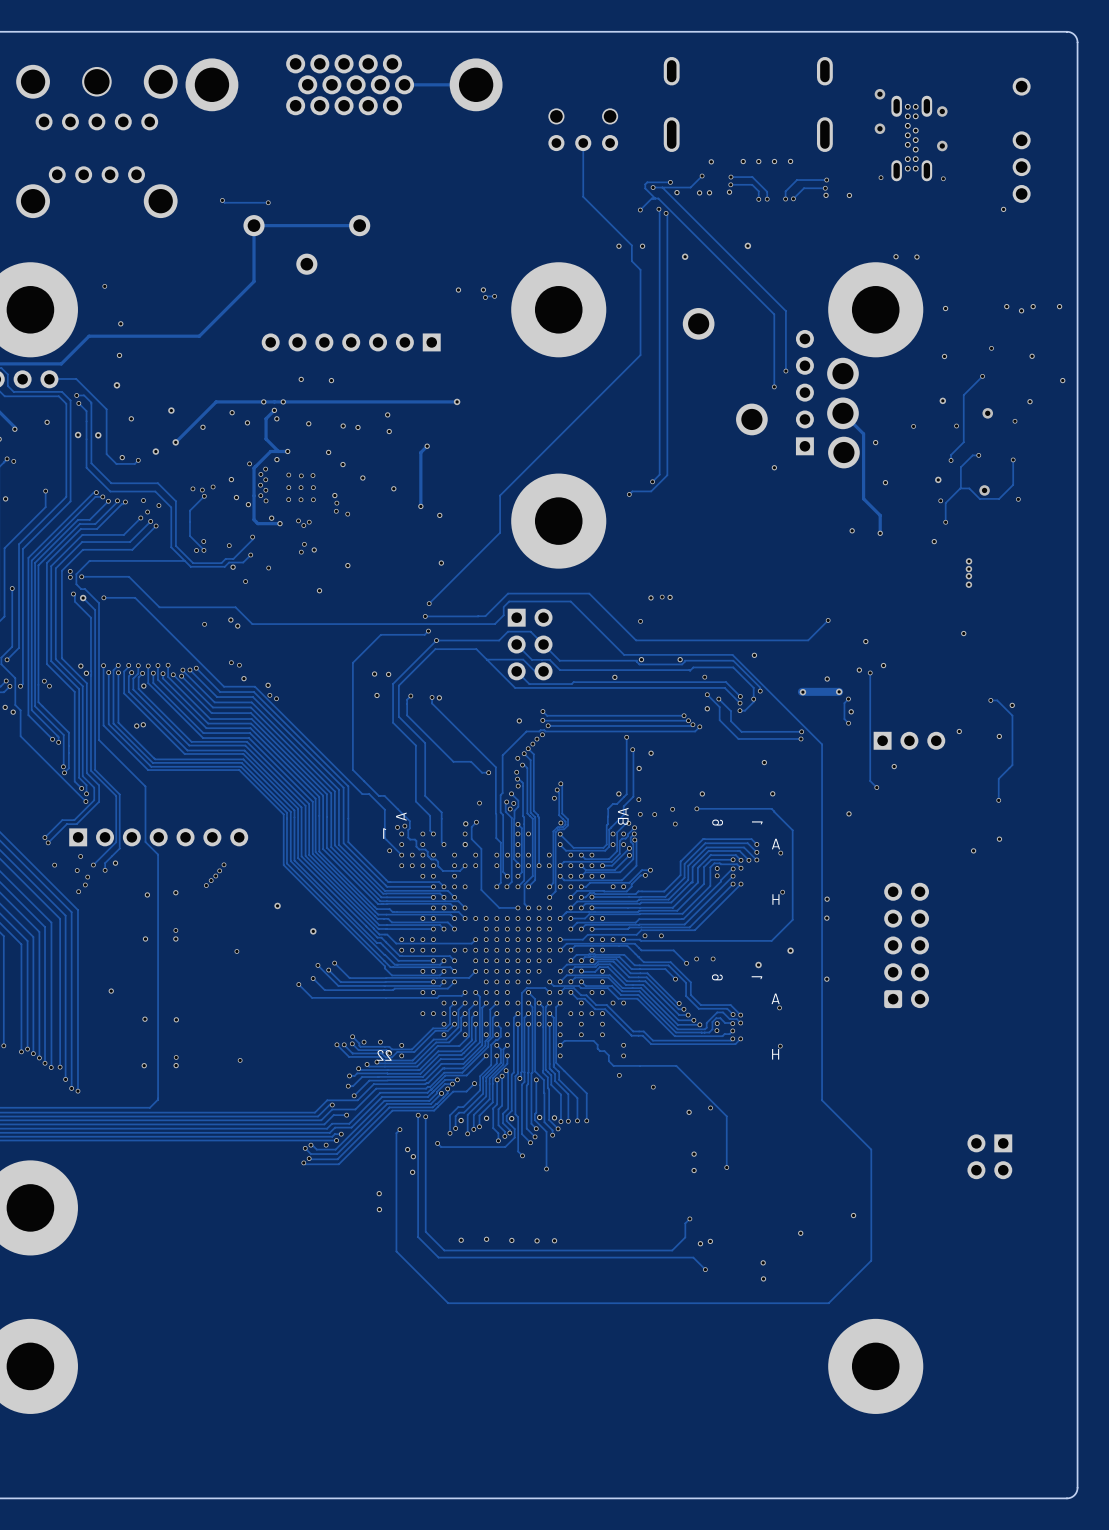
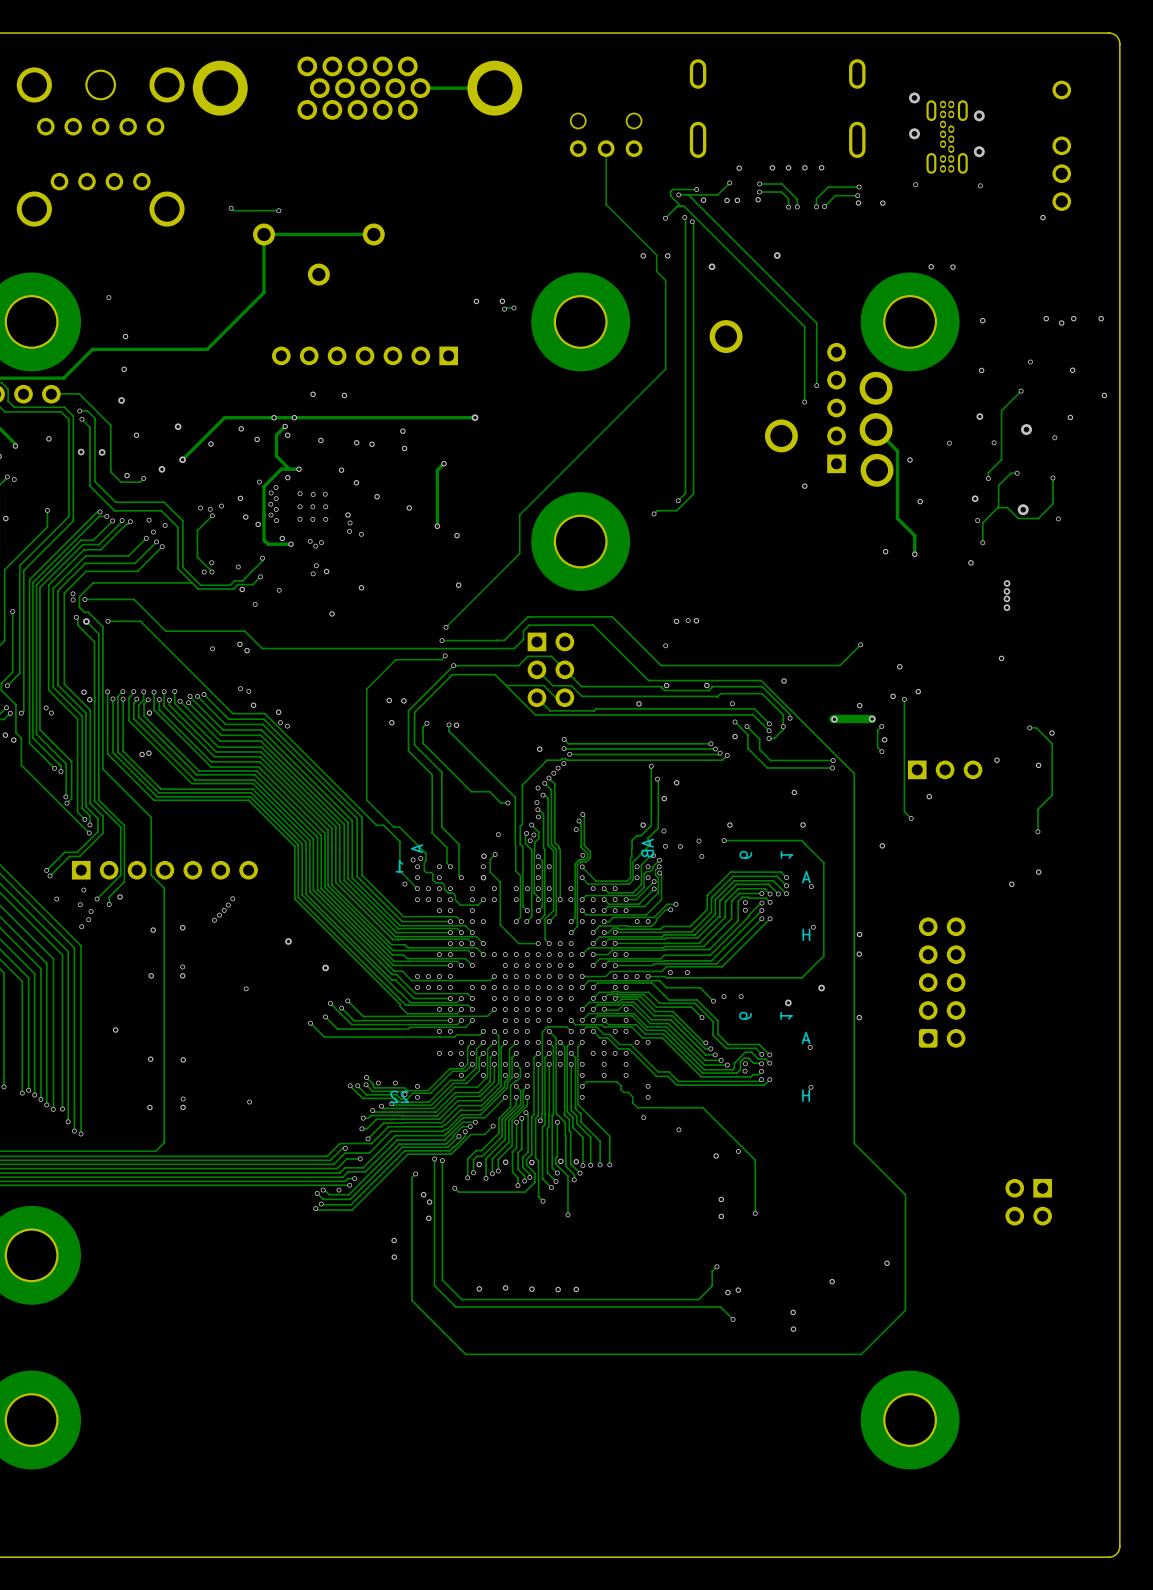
part footprint: [891, 95, 933, 182] -> [926, 100, 968, 174]

